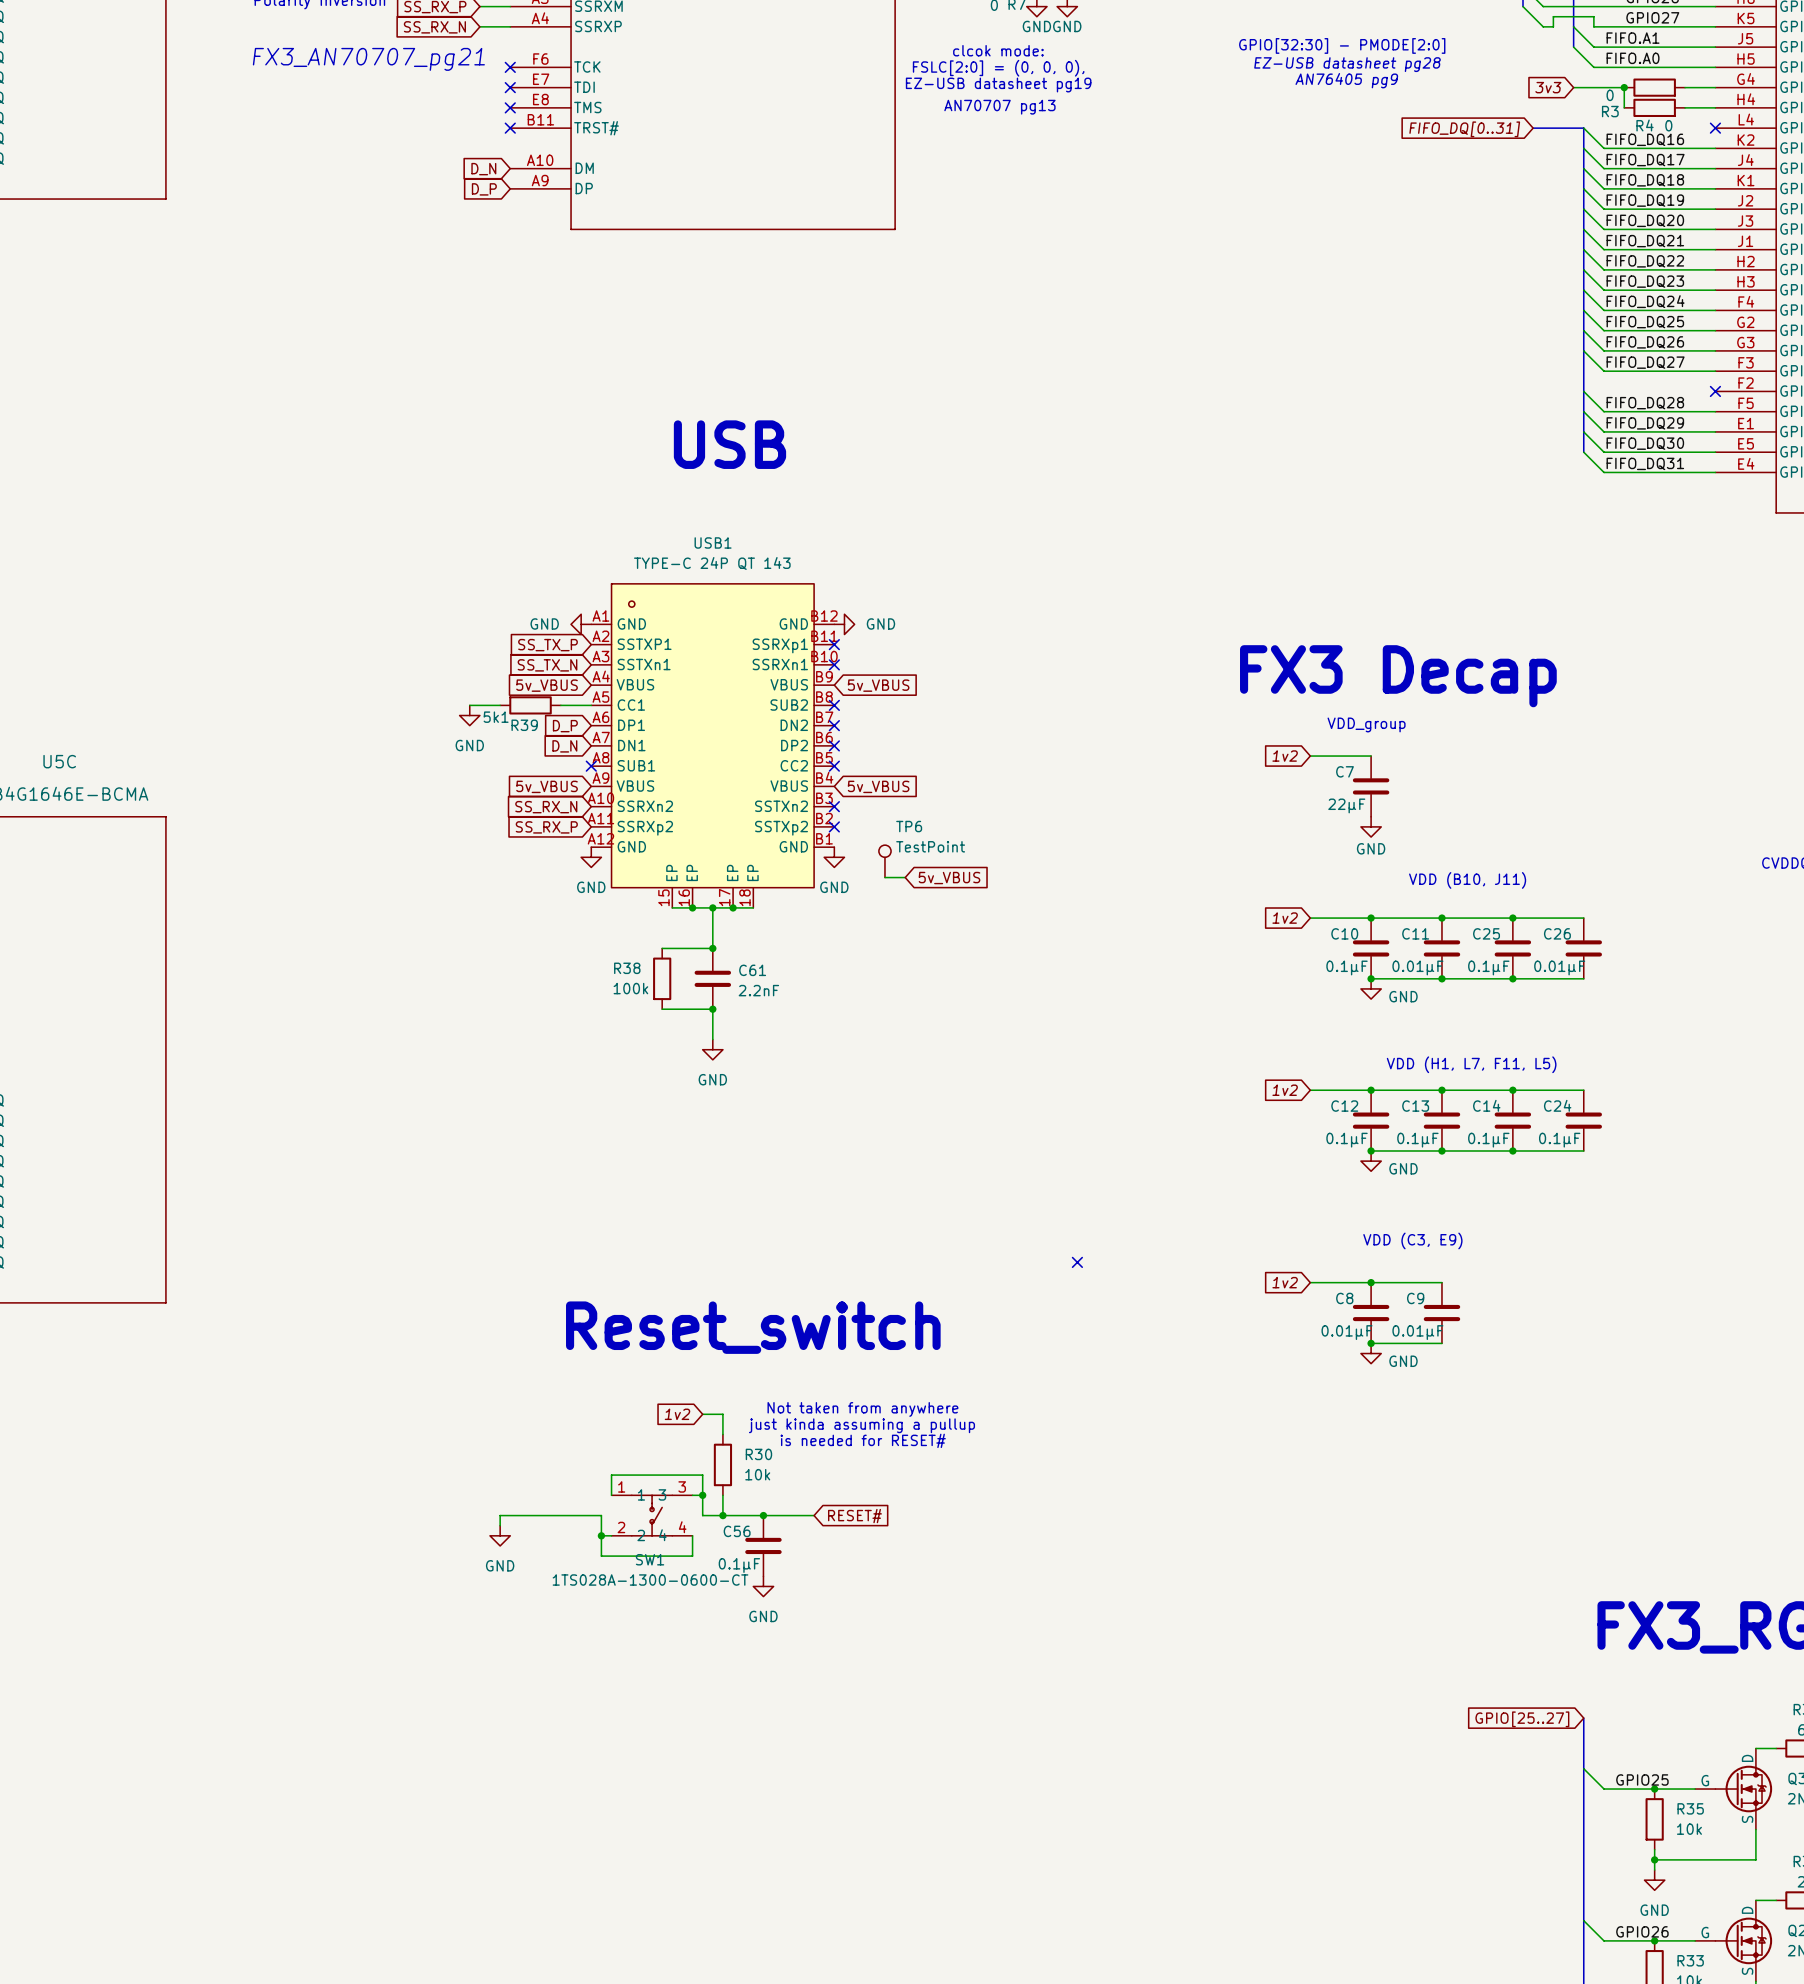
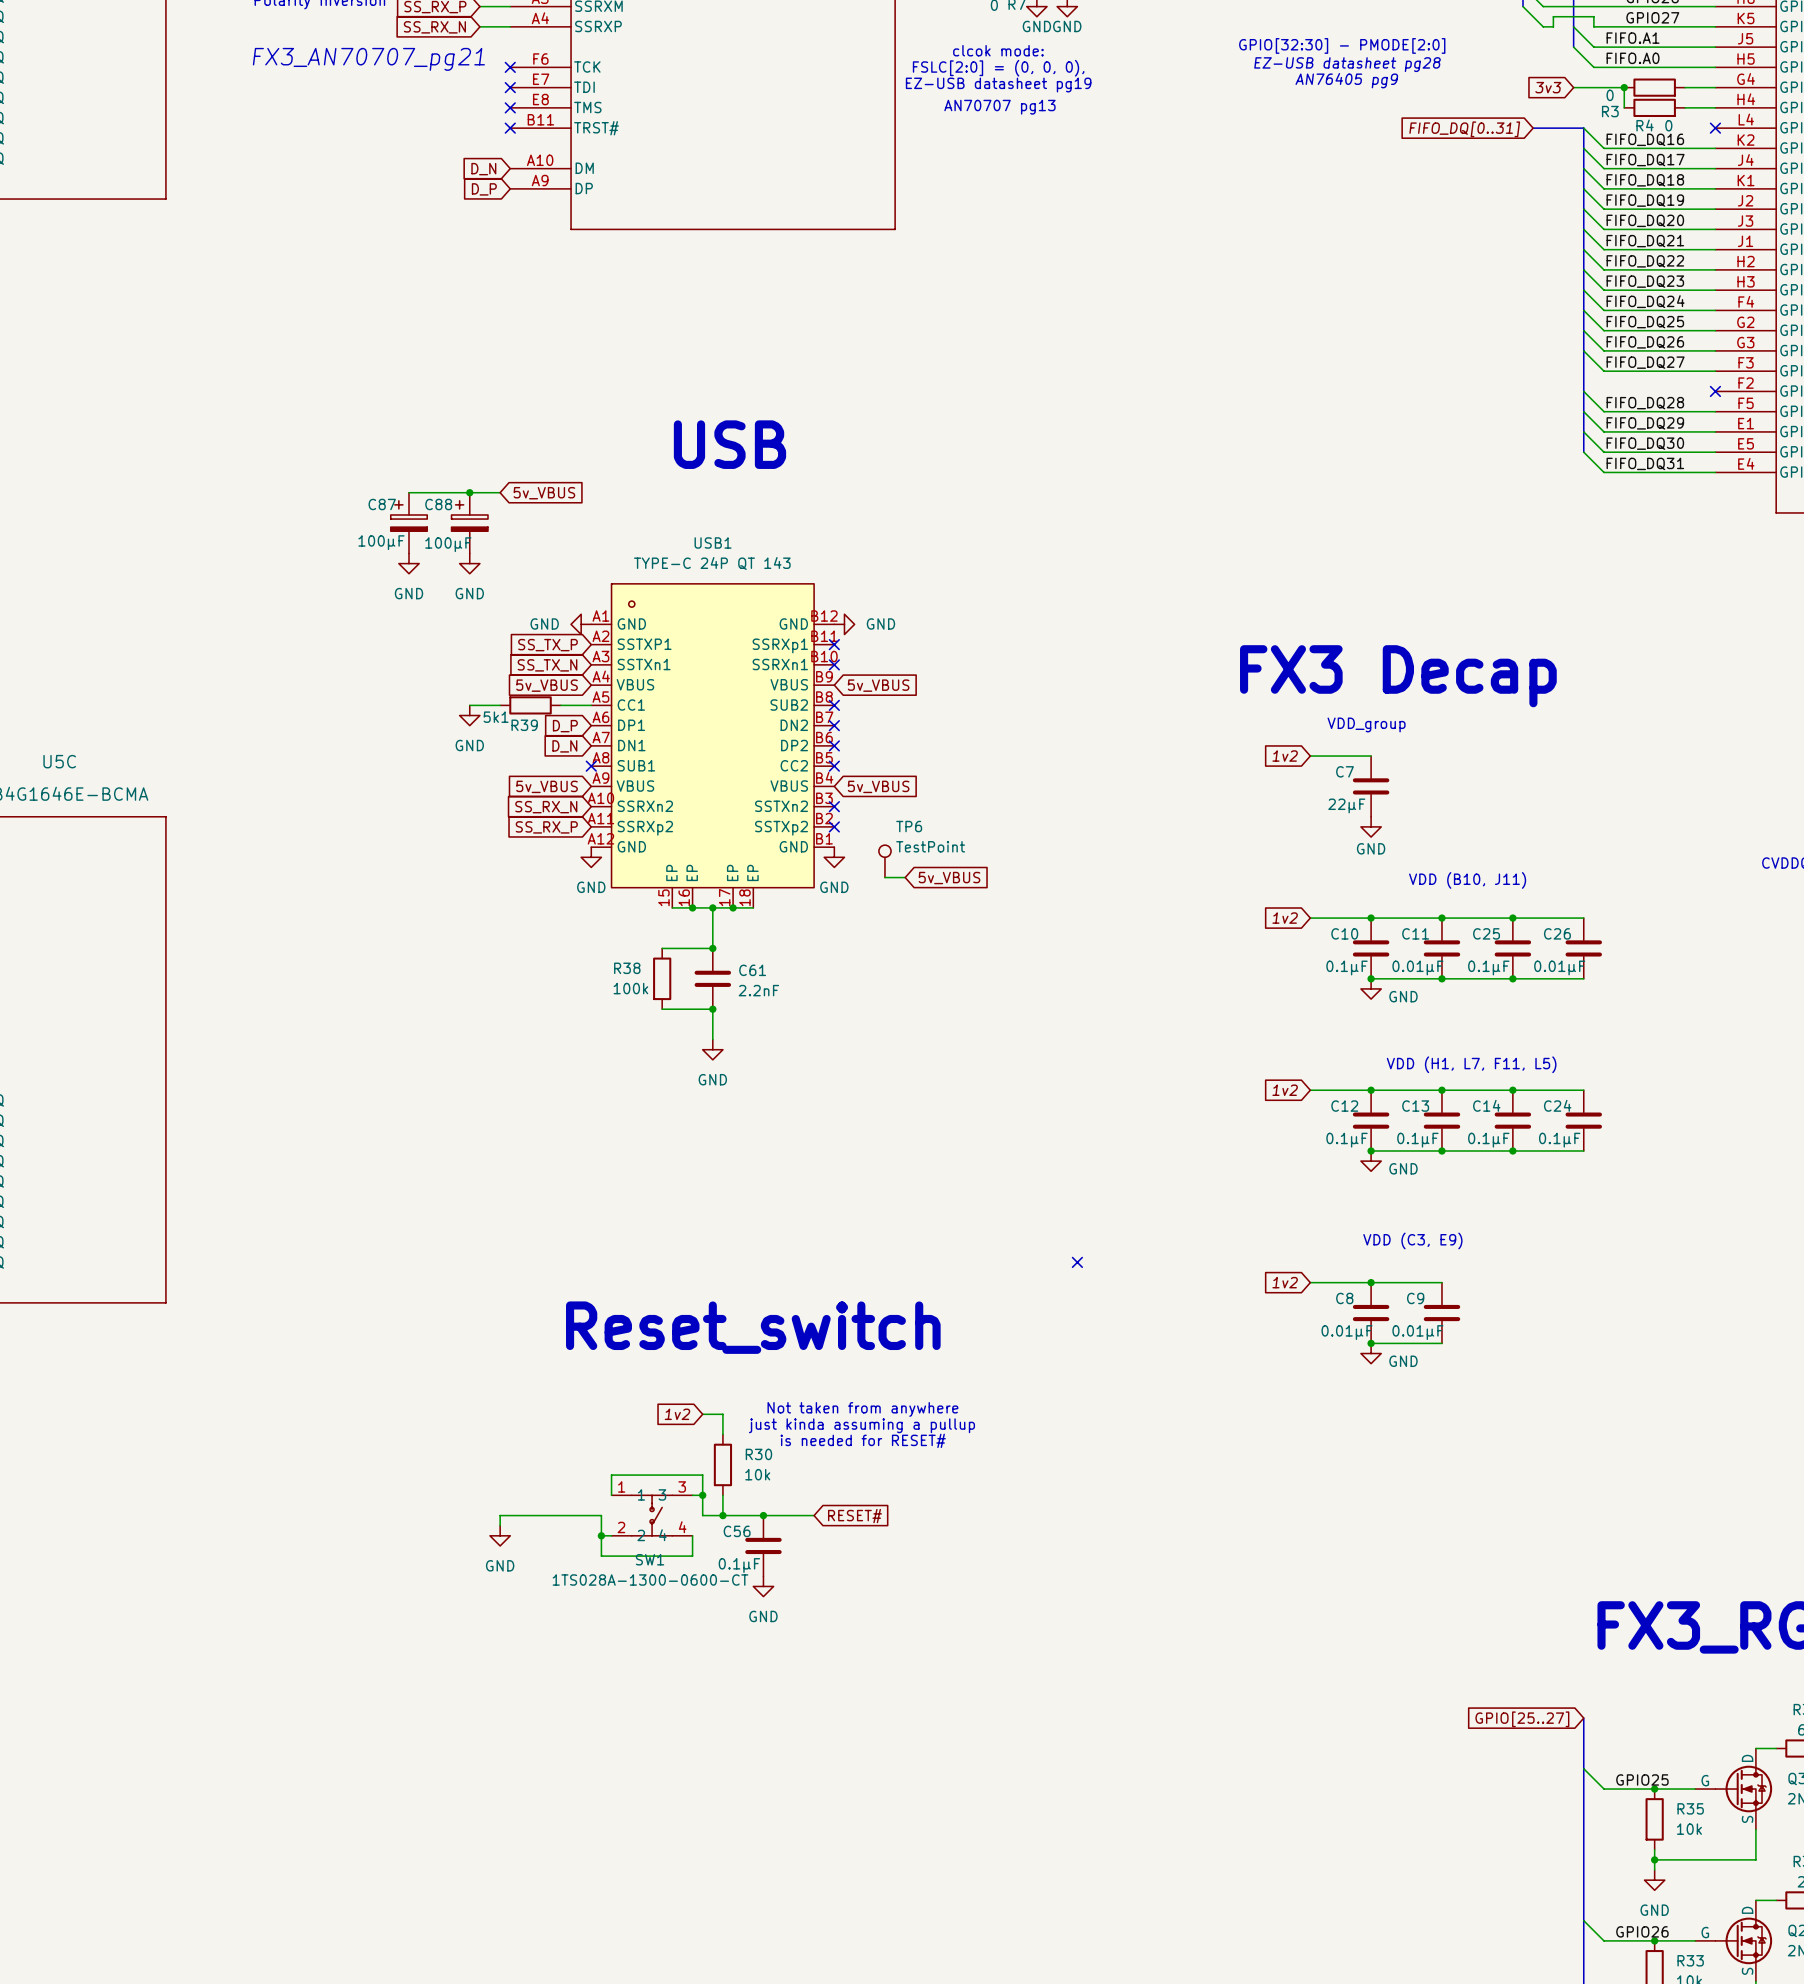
wire: none -> (408, 492) (500, 492)
junction: none -> (469, 492)
global label: none -> 5v_VBUS (544, 493)
C87: none -> 100μF (408, 523)
C88: none -> 100μF (469, 523)
power symbol: none -> GND (408, 563)
power symbol: none -> GND (469, 563)

